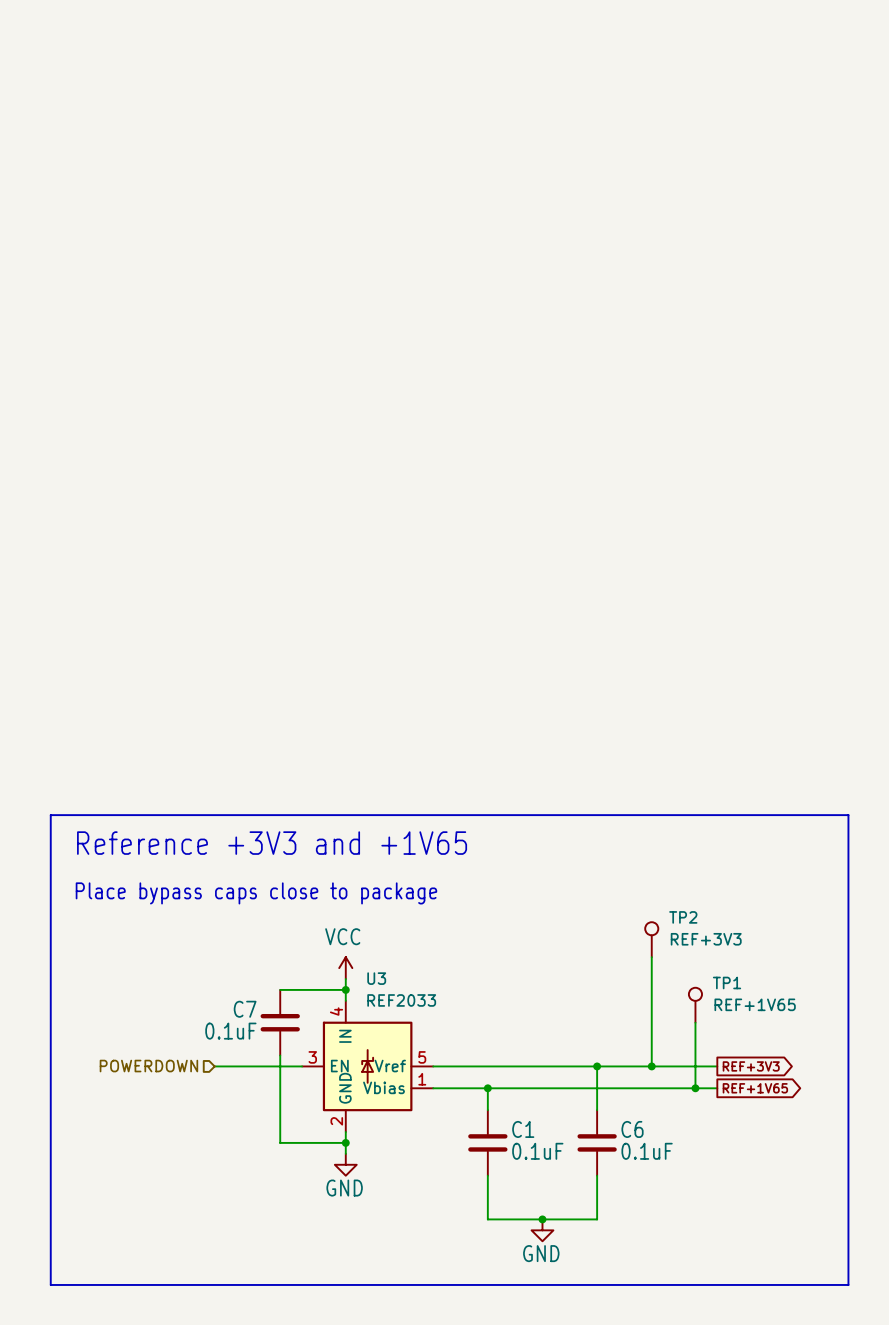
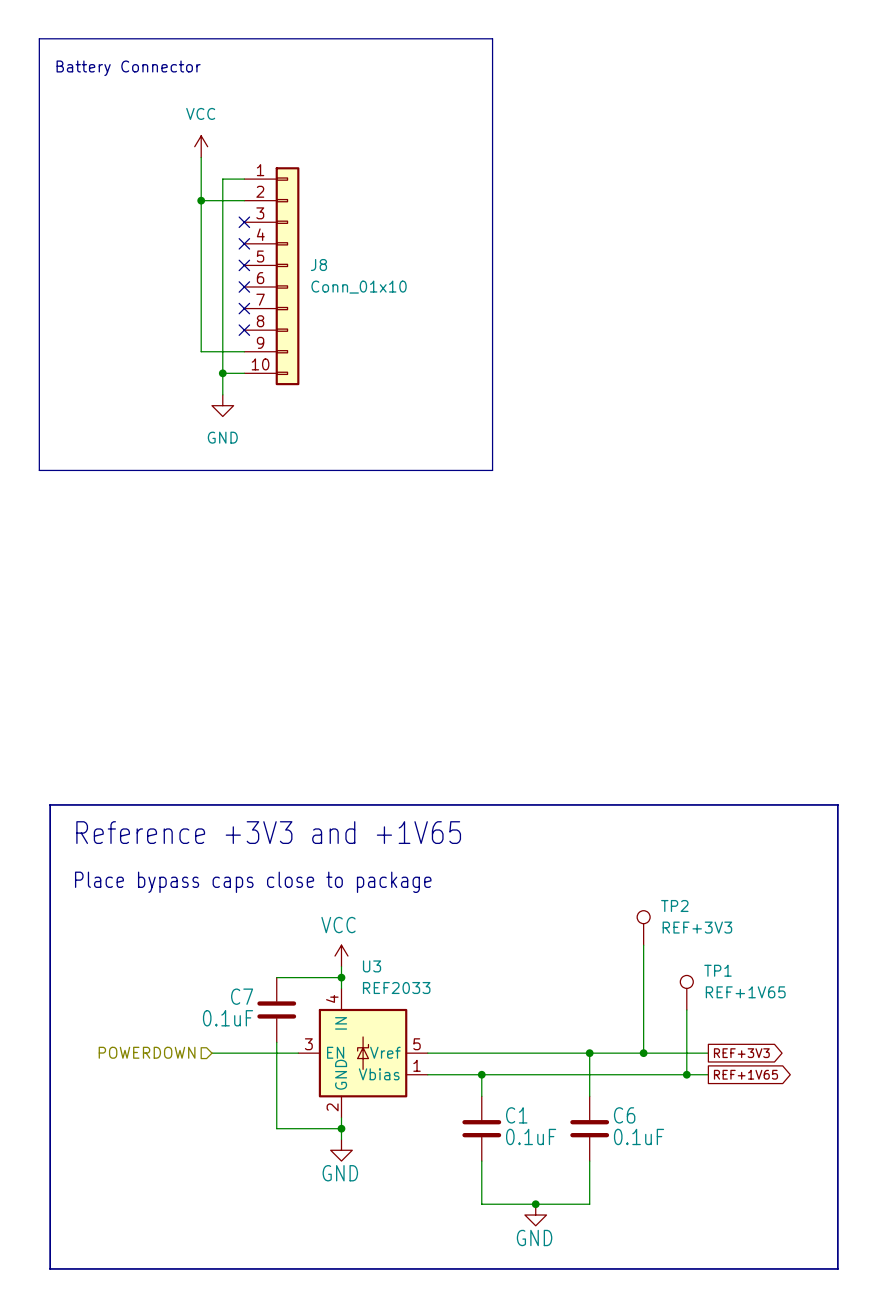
line: none -> (39, 38) (492, 38) (492, 470) (39, 470) (39, 38)
text: none -> Battery Connector (128, 68)
power symbol: none -> VCC (201, 146)
wire: none -> (201, 157) (201, 351) (244, 351)
wire: none -> (244, 179) (222, 179) (222, 394)
wire: none -> (201, 200) (244, 200)
junction: none -> (201, 200)
no-connect mark: none -> (244, 222)
no-connect mark: none -> (244, 243)
no-connect mark: none -> (244, 265)
J8: none -> Conn_01x10 (271, 276)
no-connect mark: none -> (244, 286)
no-connect mark: none -> (244, 308)
no-connect mark: none -> (244, 330)
wire: none -> (222, 373) (244, 373)
junction: none -> (222, 373)
power symbol: none -> GND (222, 405)

